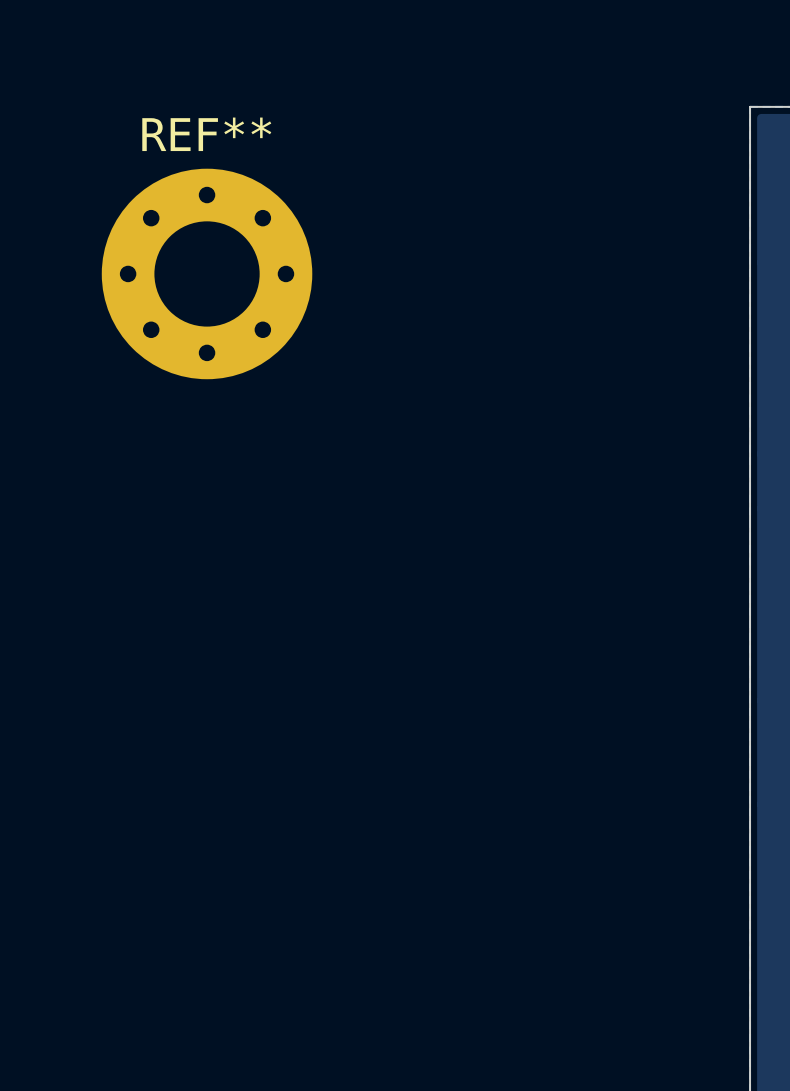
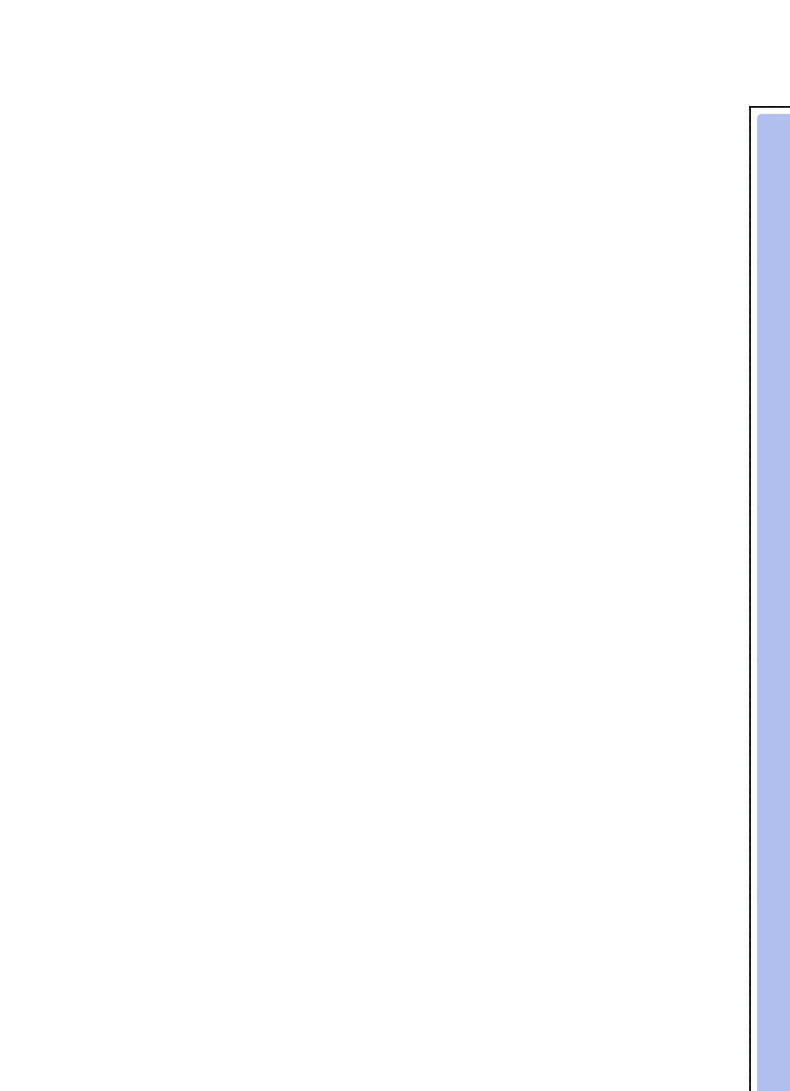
REF**: (207, 273) -> none

